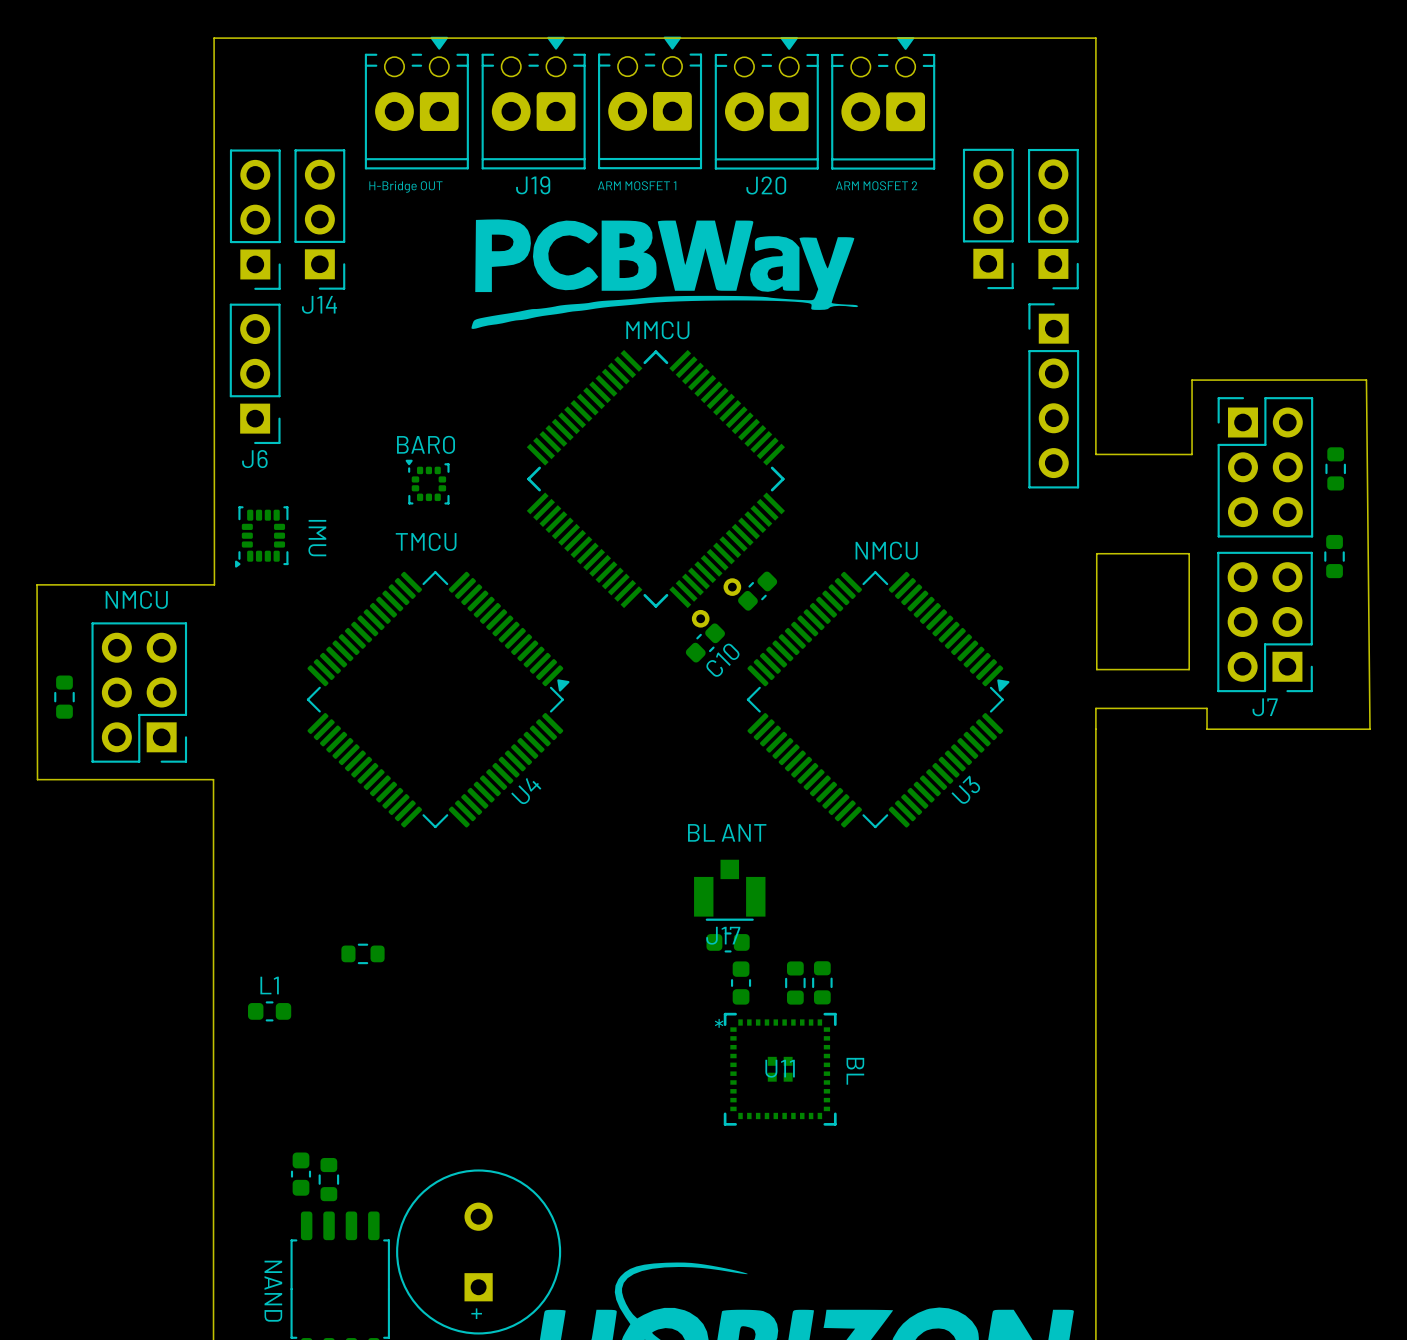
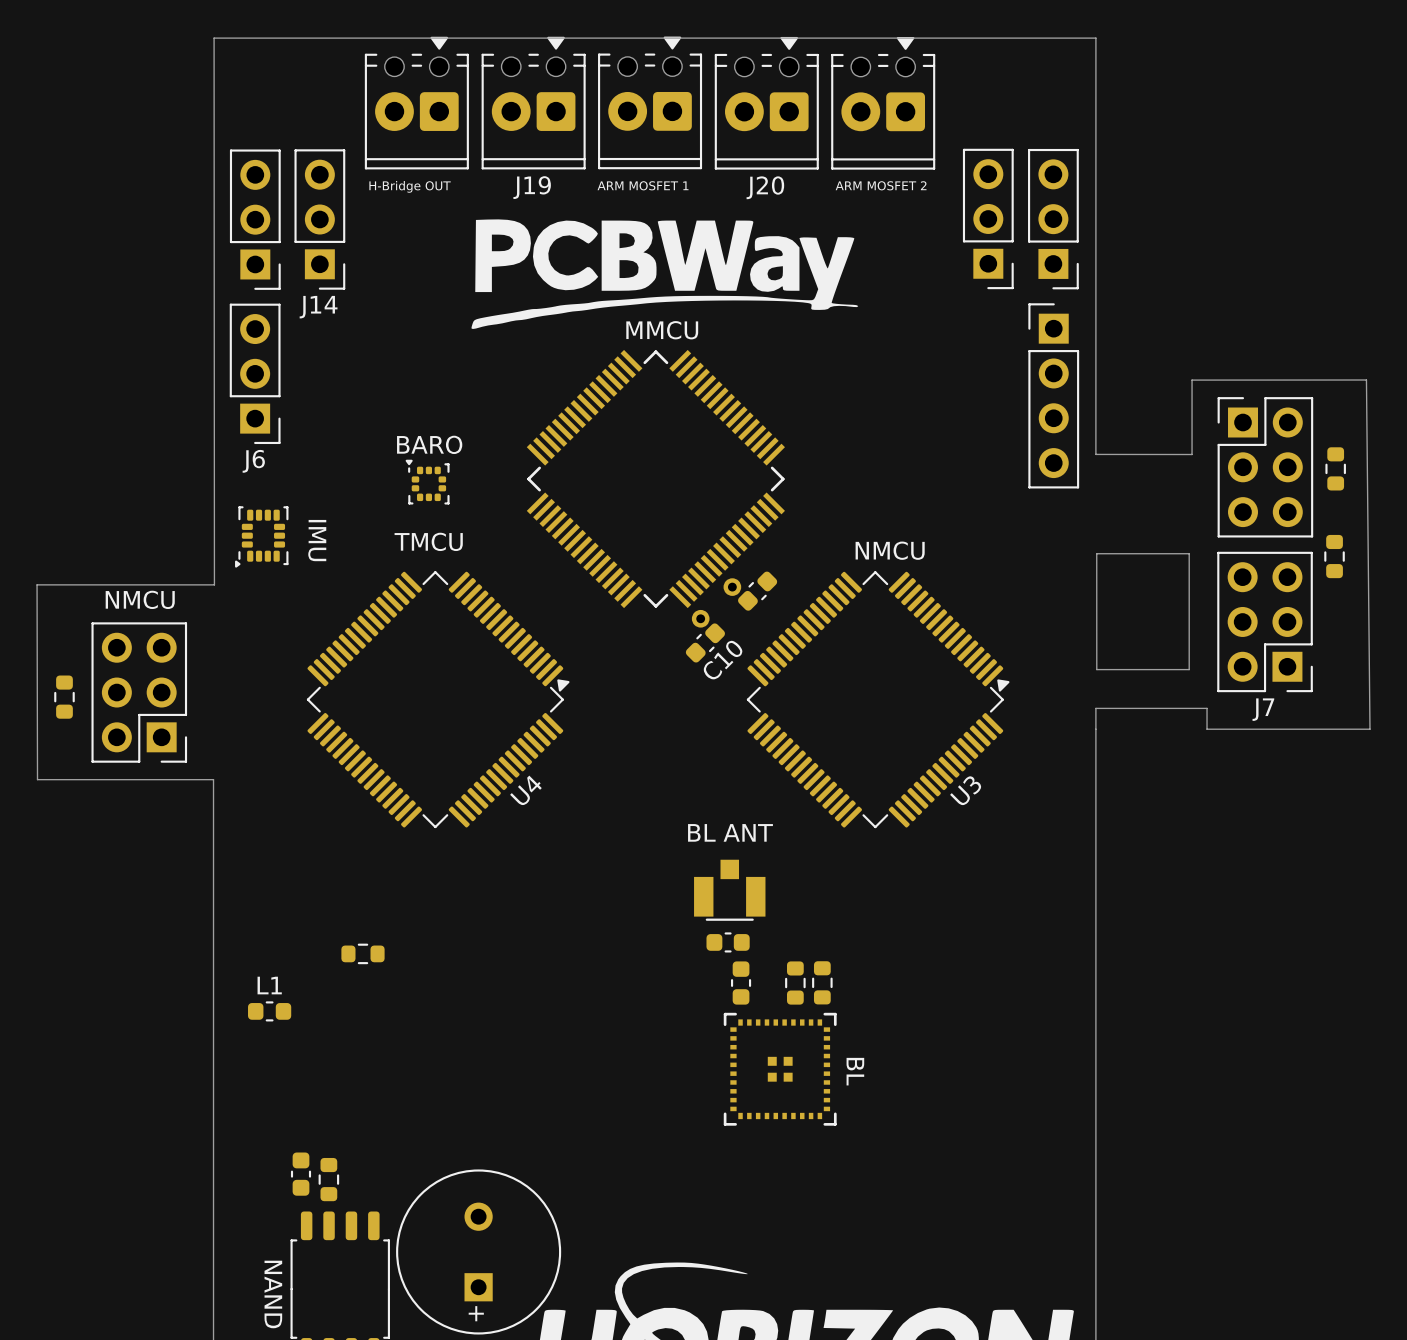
J17 name: J17 (723, 935) -> none
U11 text: * (719, 1023) -> none
U11 name: U11 (780, 1068) -> none

